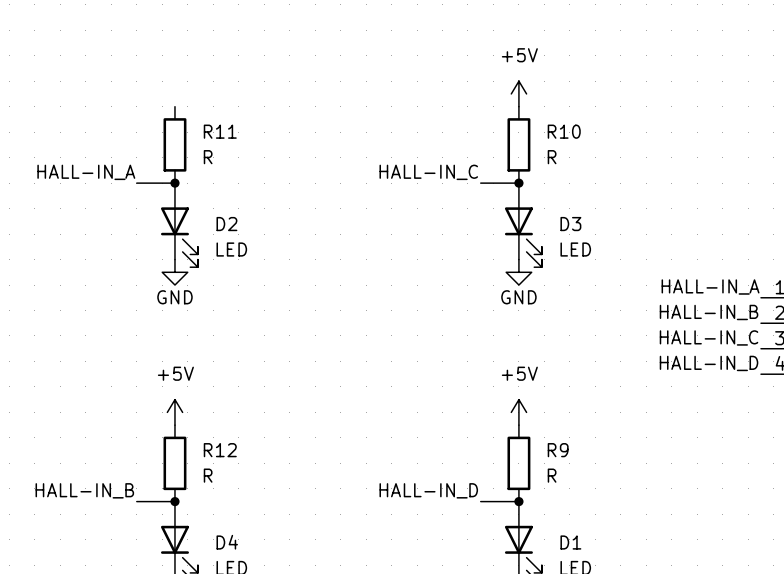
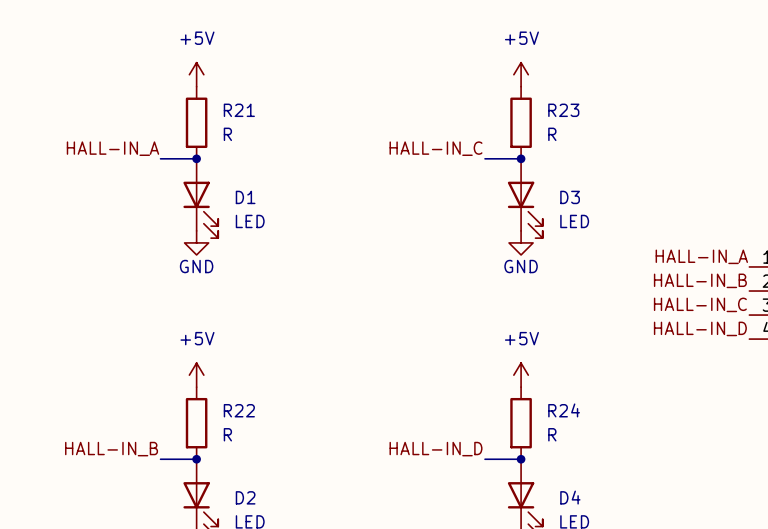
power symbol: none -> +5V (196, 74)
R11 name: R11 (220, 131) -> R21 (239, 110)
R10 name: R10 (564, 131) -> R23 (563, 110)
D2 name: D2 (226, 224) -> D1 (245, 197)
R12 name: R12 (220, 450) -> R22 (239, 410)
R9 name: R9 (558, 450) -> R24 (564, 410)
D4 name: D4 (227, 542) -> D2 (245, 497)
D1 name: D1 (570, 542) -> D4 (570, 497)

